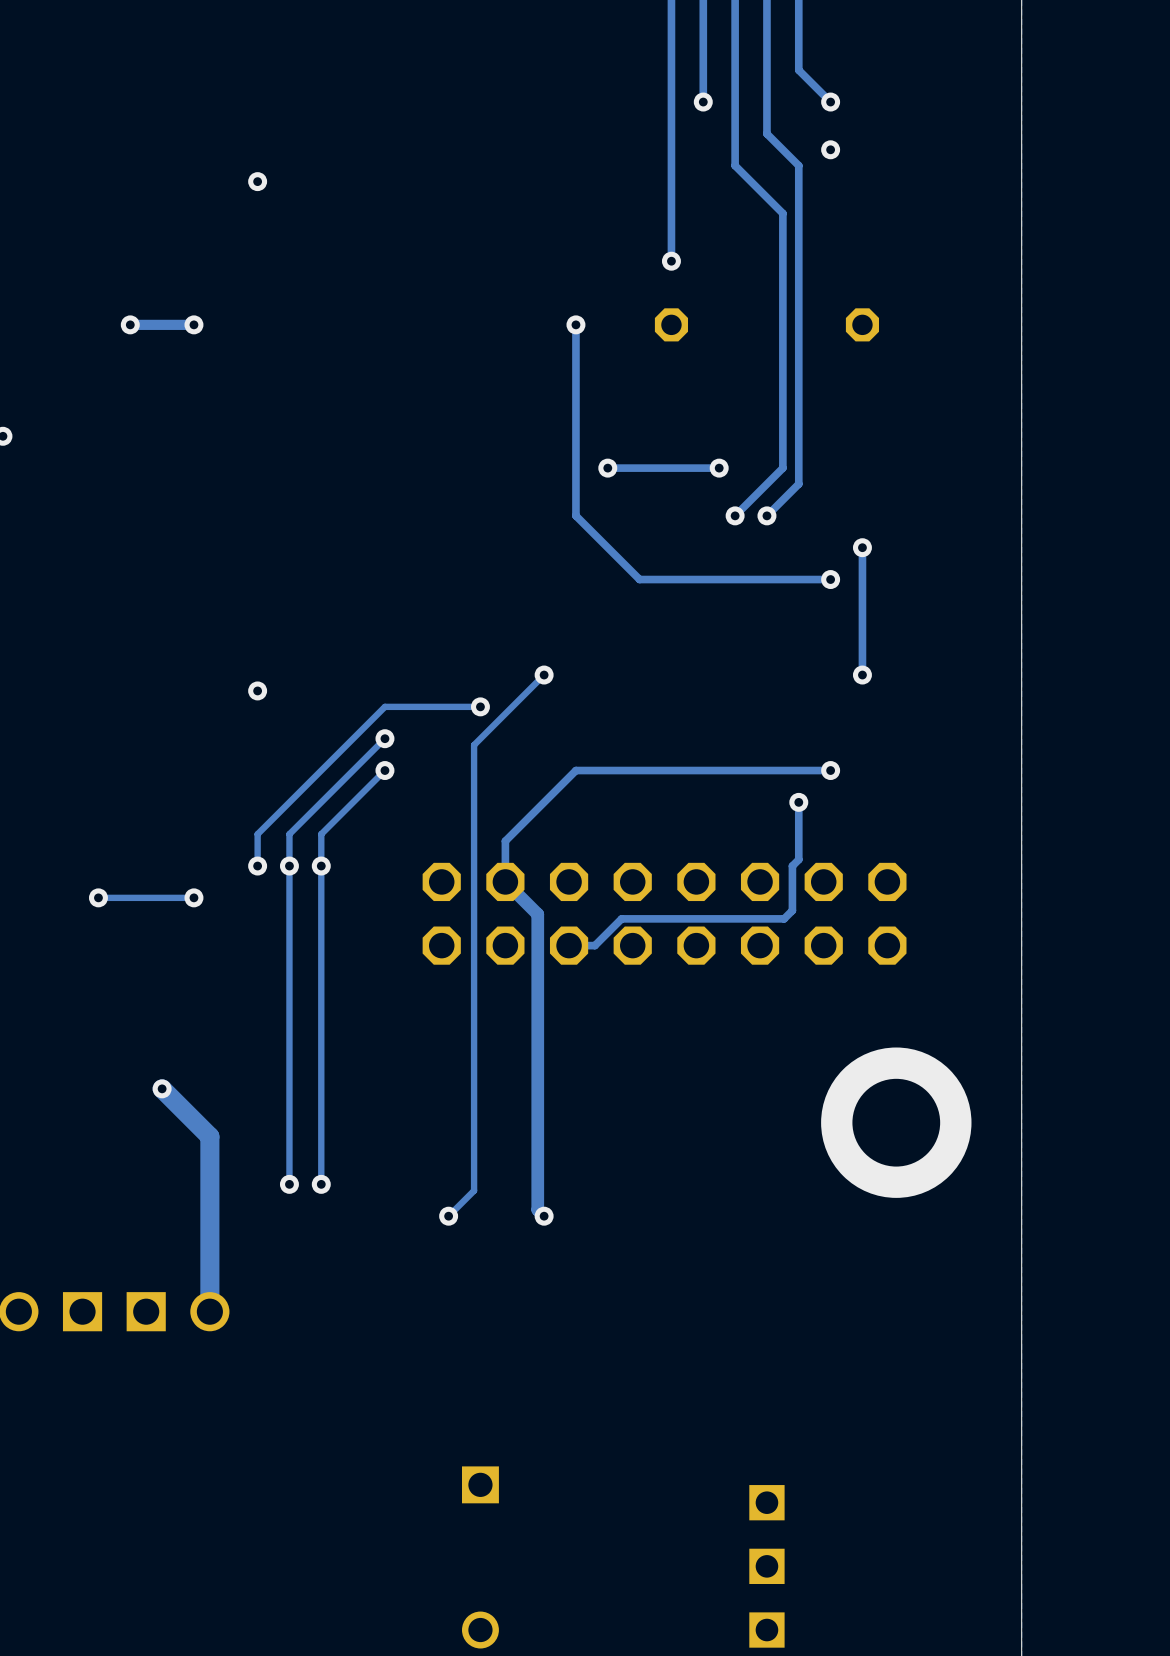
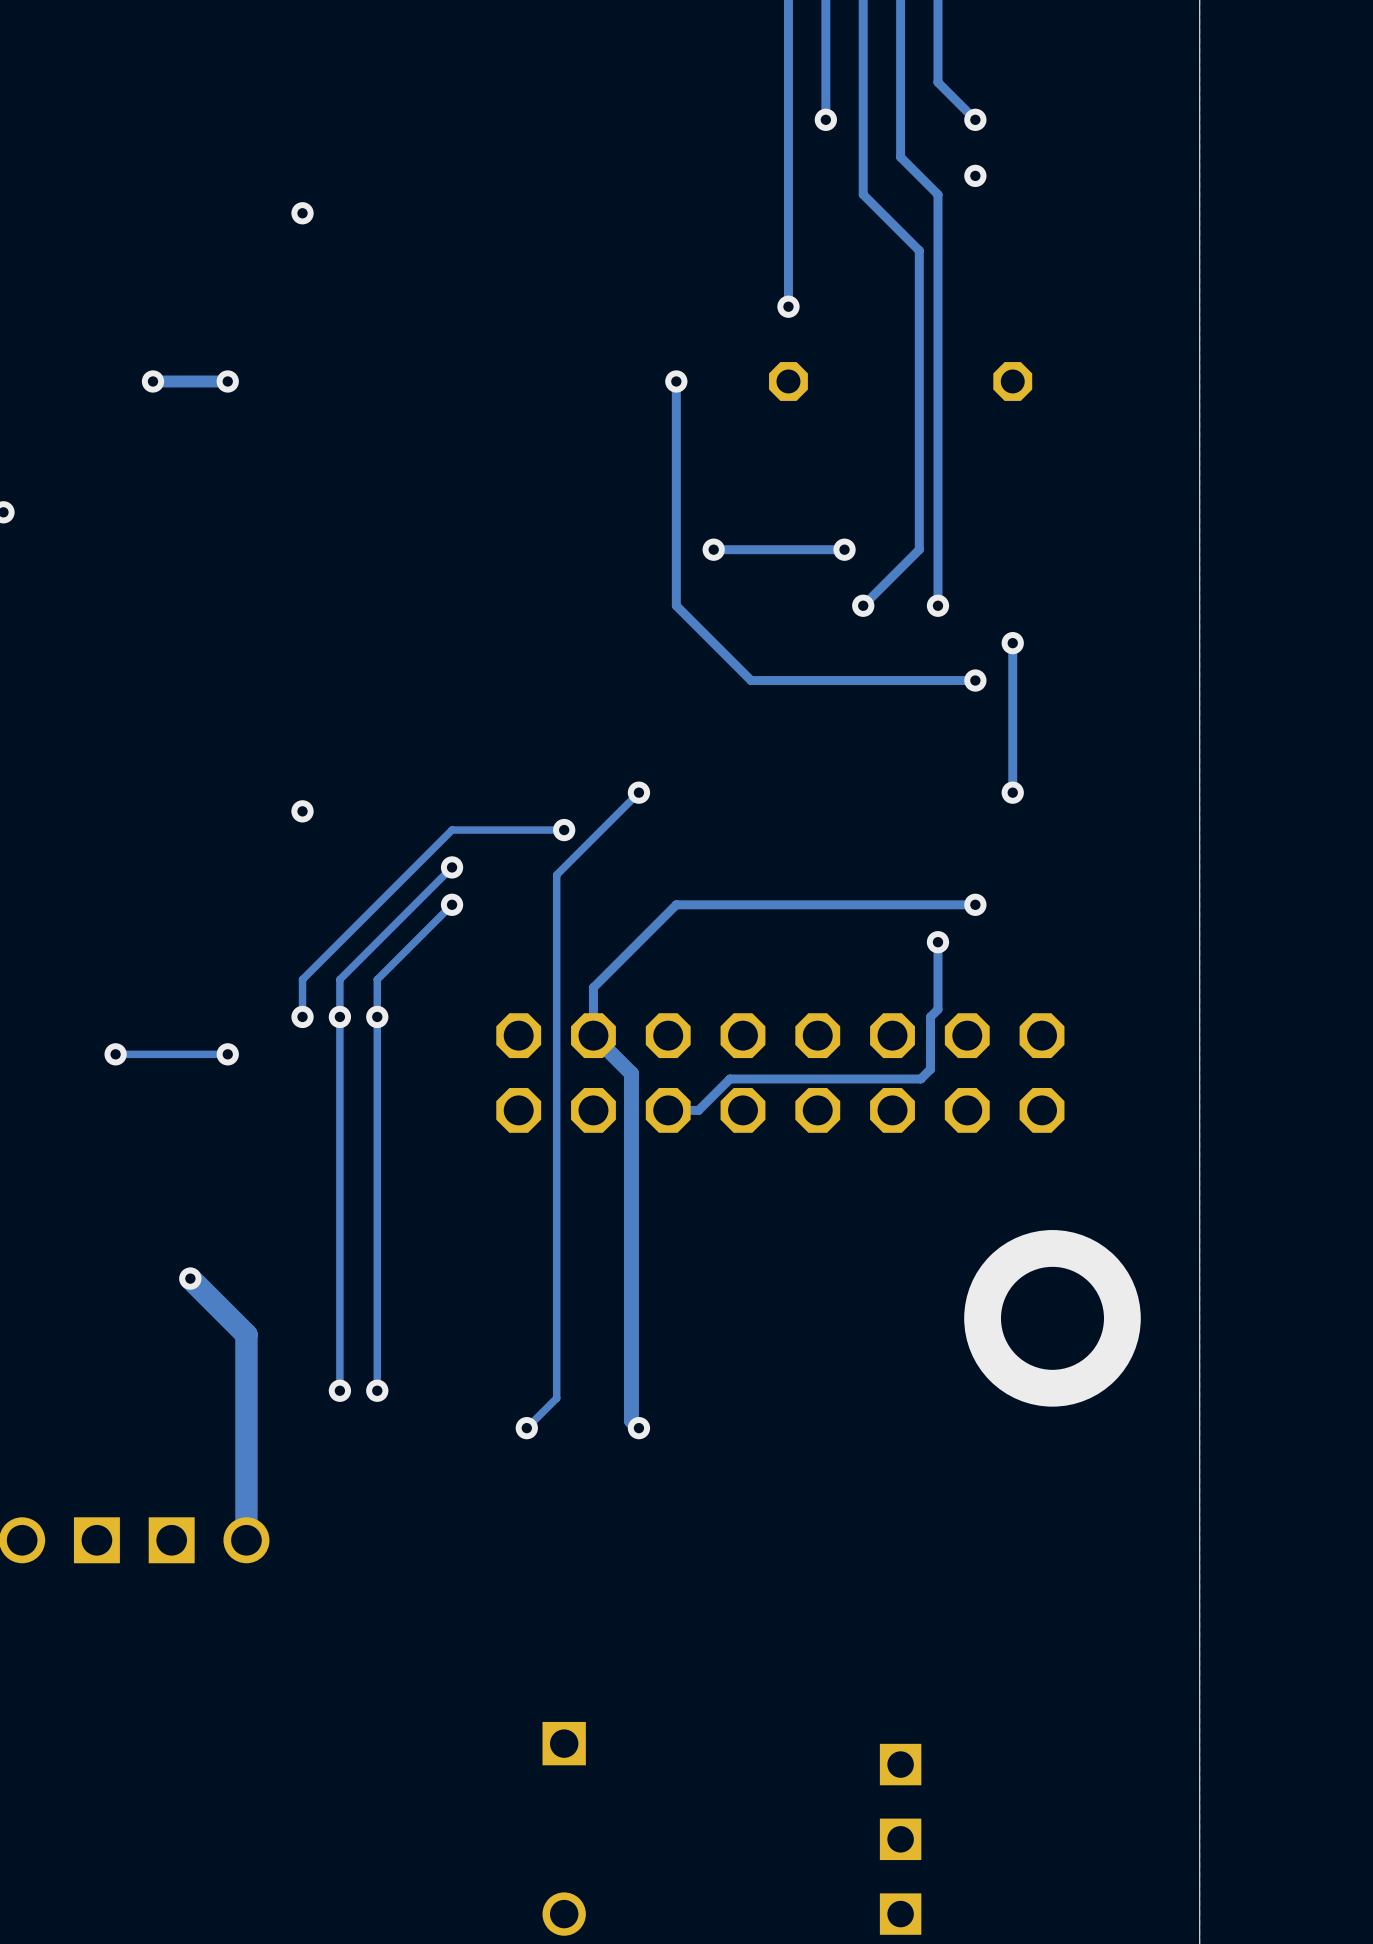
track: (798, 484) (766, 515) -> (937, 568) (937, 605)
via position: (766, 515) -> (937, 605)

